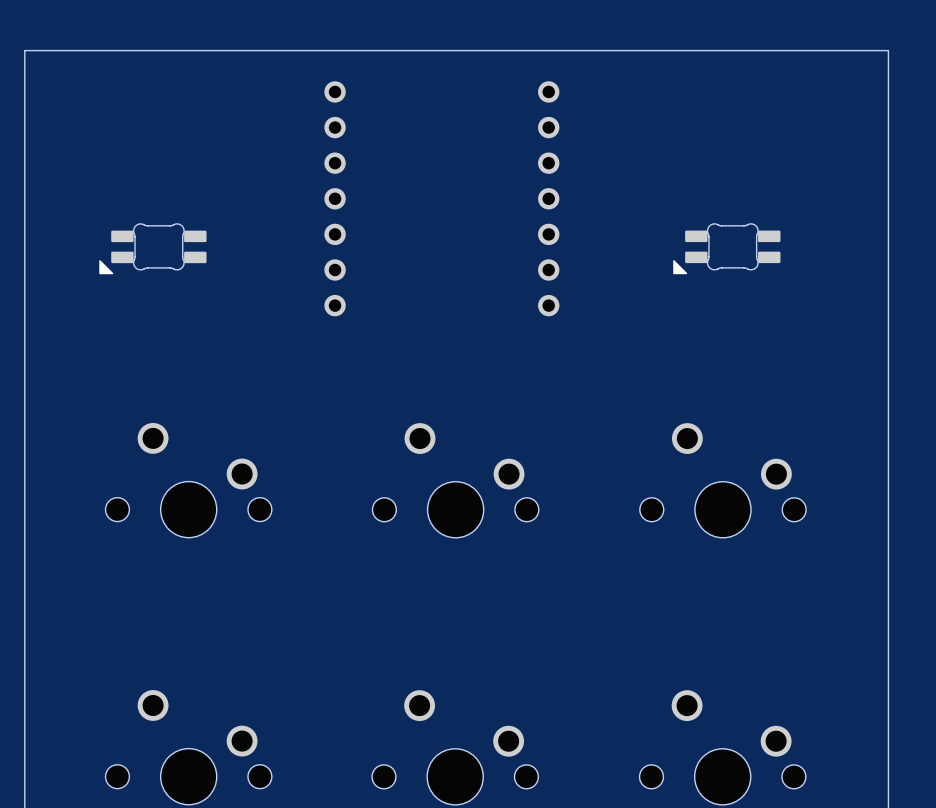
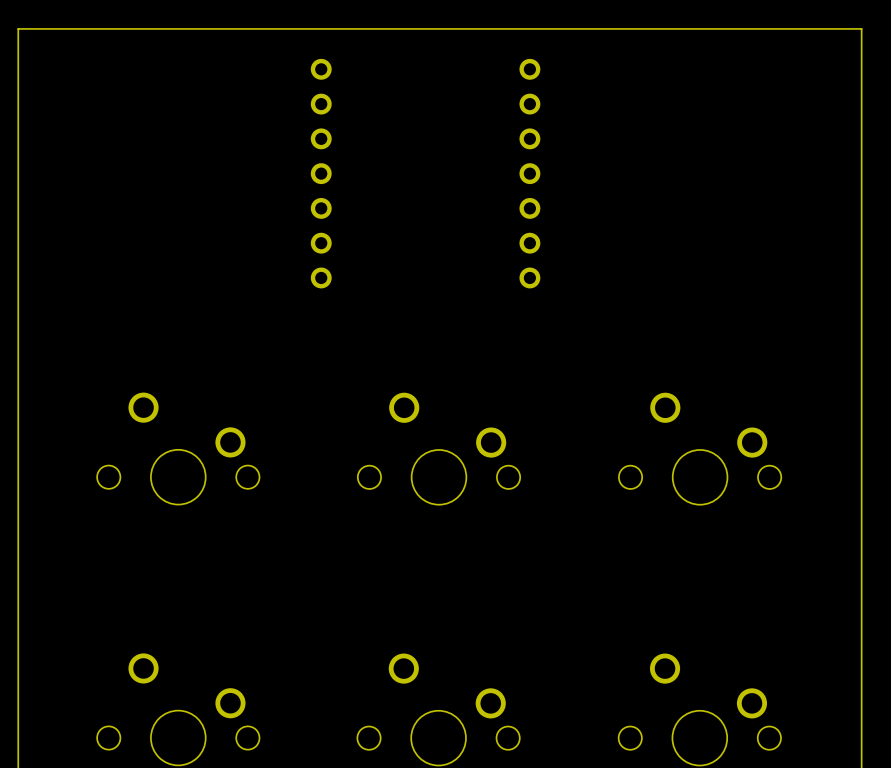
part: (152, 248) -> none
part: (726, 248) -> none

